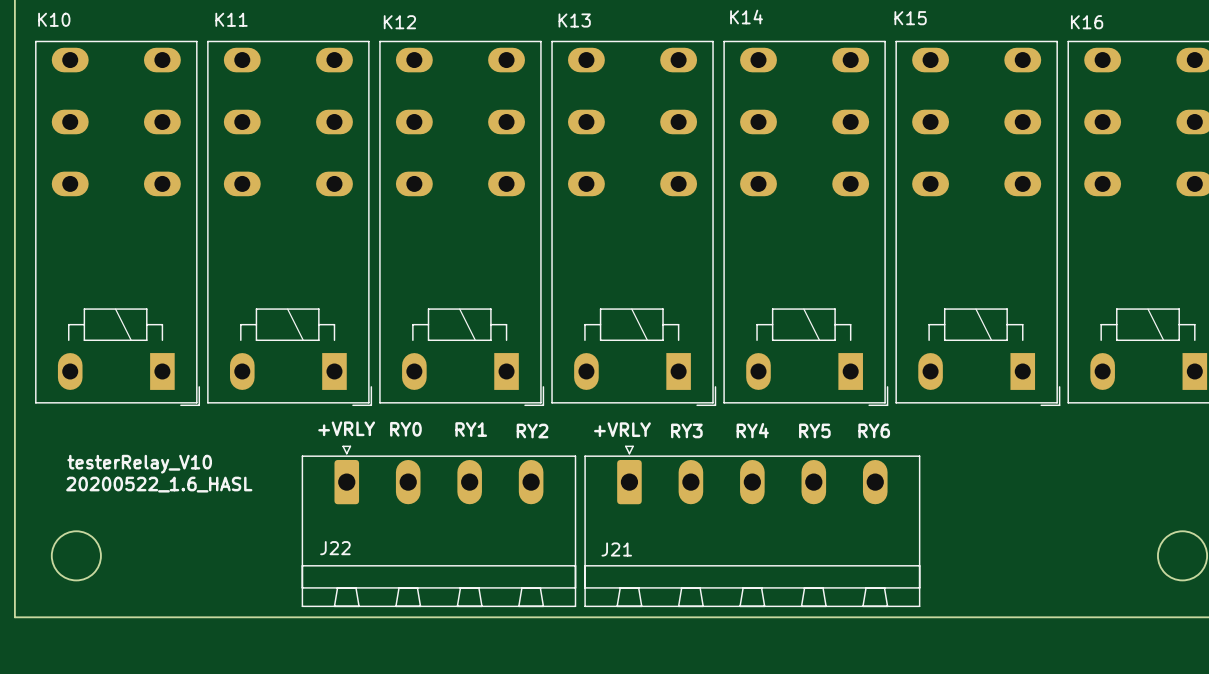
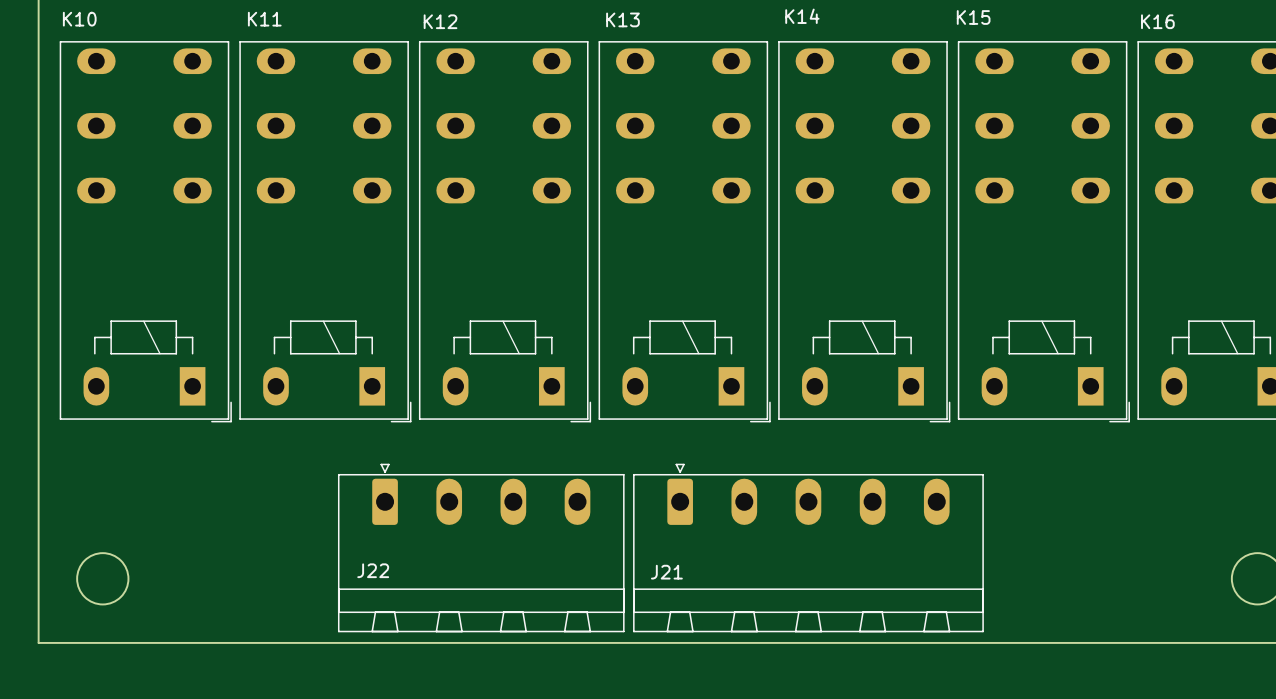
text: +VRLY (346, 428) -> none
text: RY0 (405, 429) -> none
text: RY1 (471, 429) -> none
text: +VRLY (622, 429) -> none
text: RY3 (686, 430) -> none
text: RY4 (752, 430) -> none
text: RY5 (814, 430) -> none
text: RY6 (874, 430) -> none
text: RY2 (532, 431) -> none
text: testerRelay_V10 (139, 464) -> none
text: 20200522_1.6_HASL (159, 484) -> none

